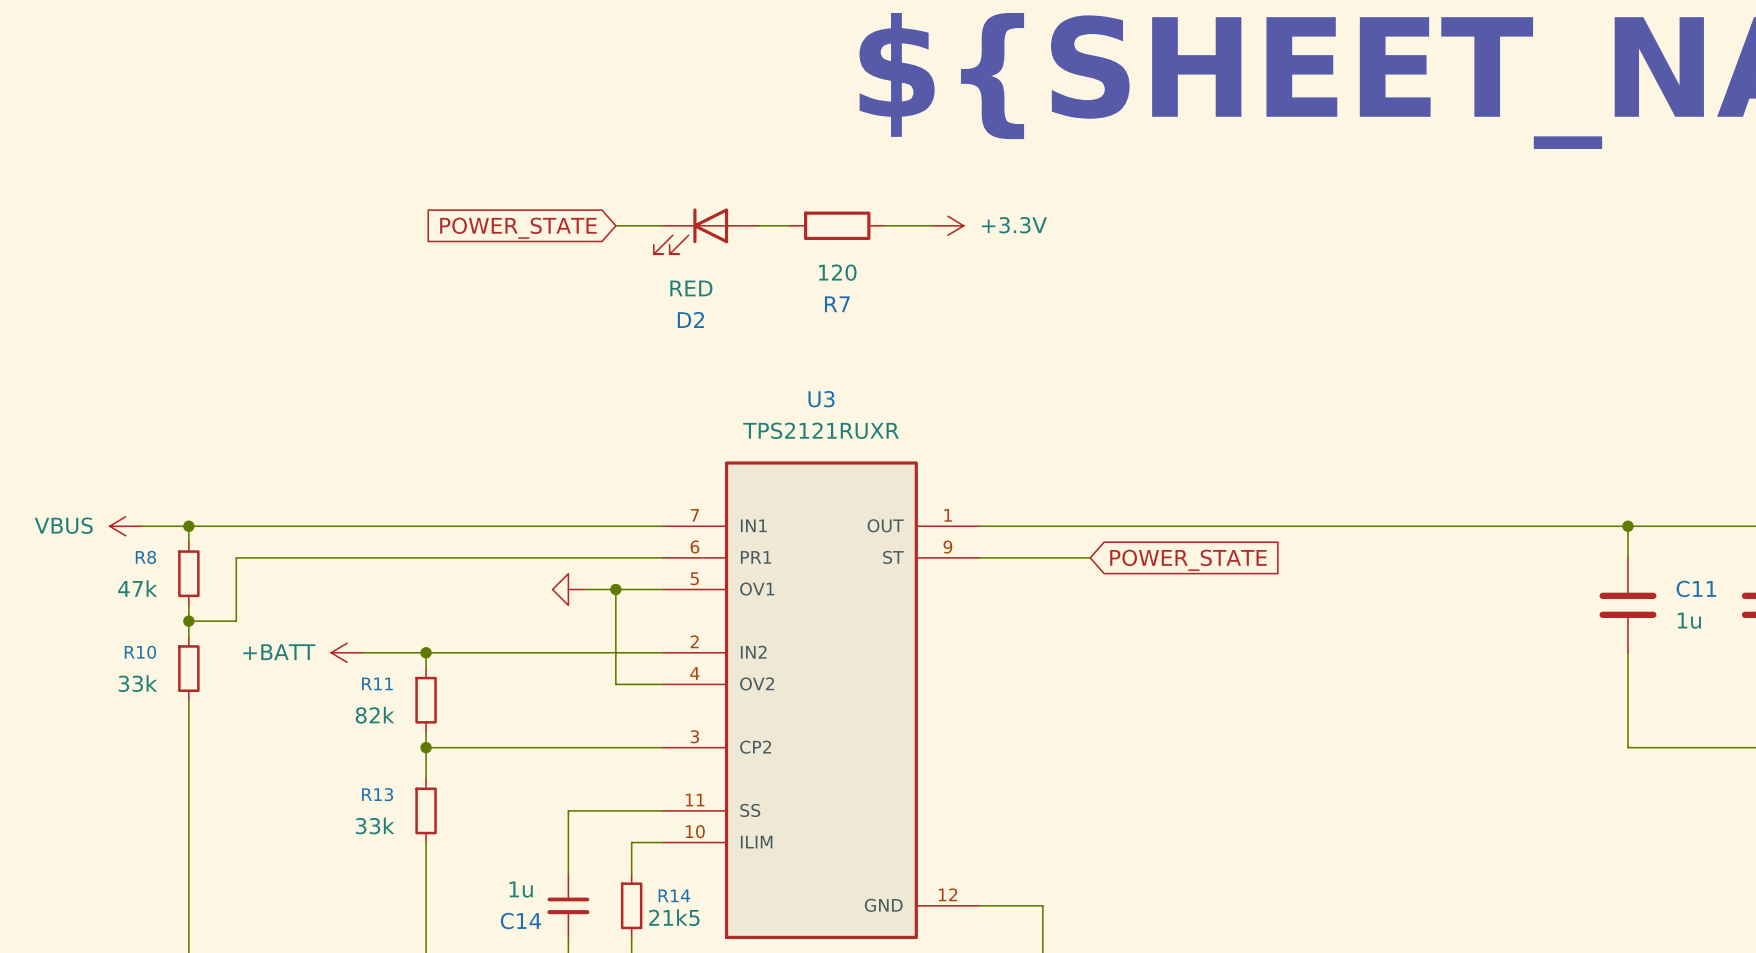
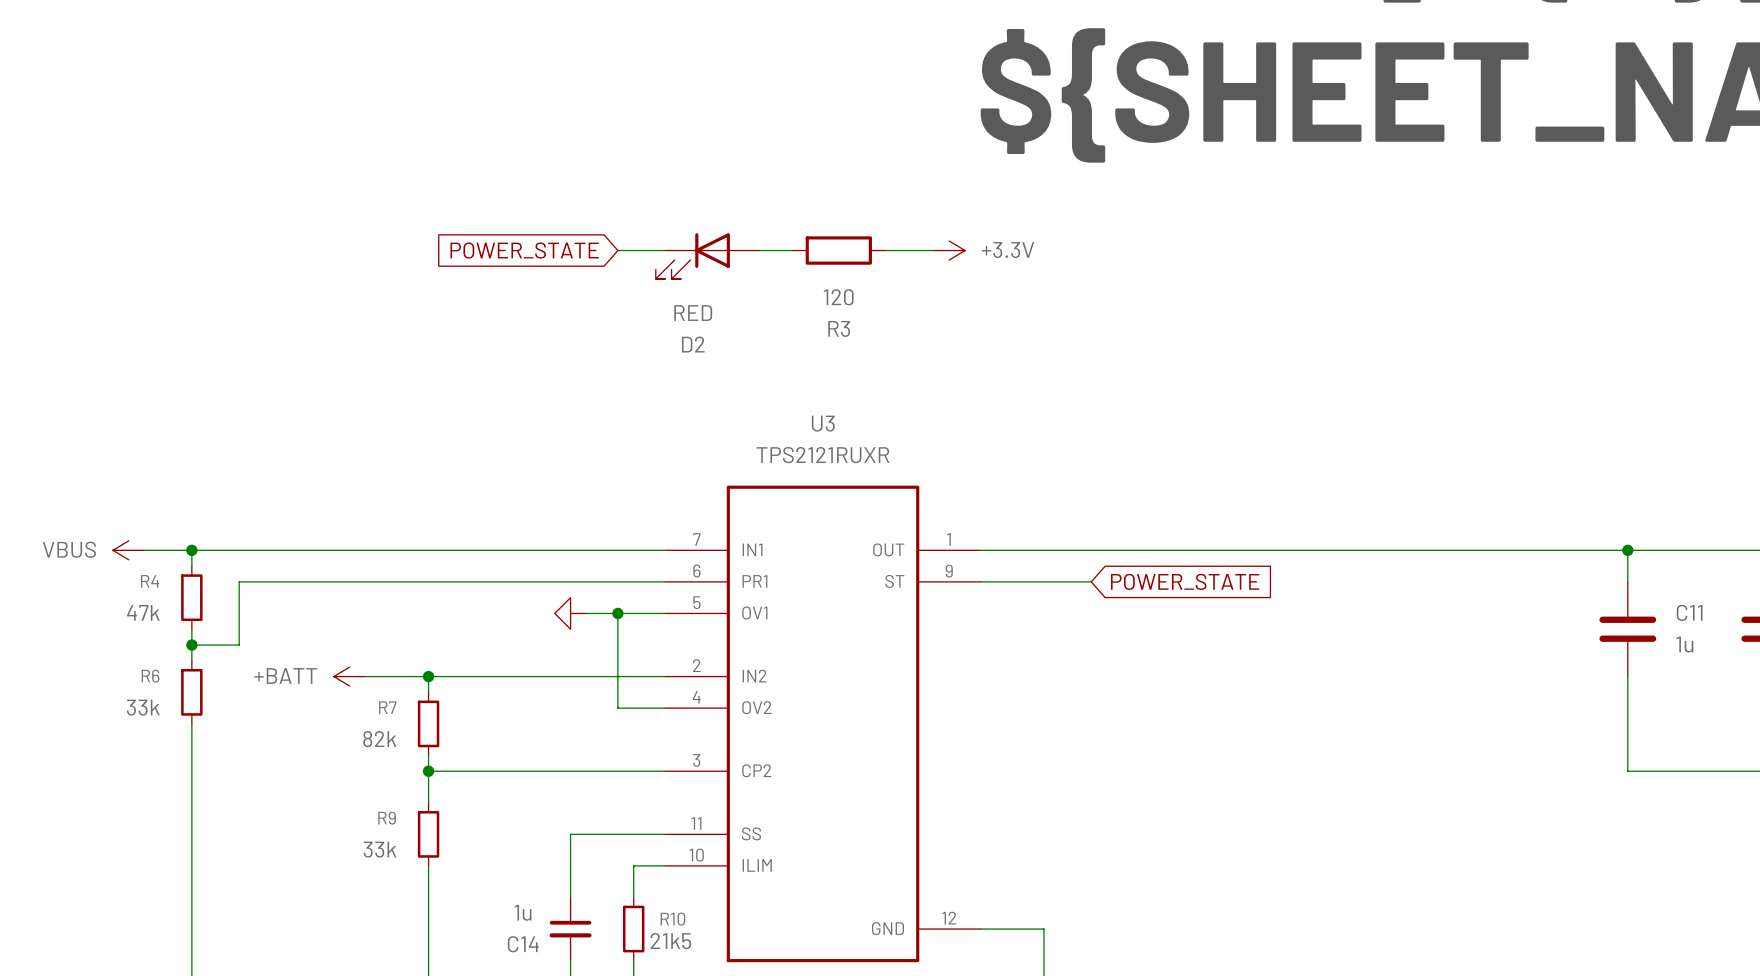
R7 name: R7 (837, 304) -> R3 (839, 328)
R8 name: R8 (145, 557) -> R4 (150, 581)
R10 name: R10 (140, 652) -> R6 (150, 676)
R11 name: R11 (377, 683) -> R7 (387, 707)
R13 name: R13 (377, 794) -> R9 (387, 818)
R14 name: R14 (674, 895) -> R10 (672, 919)

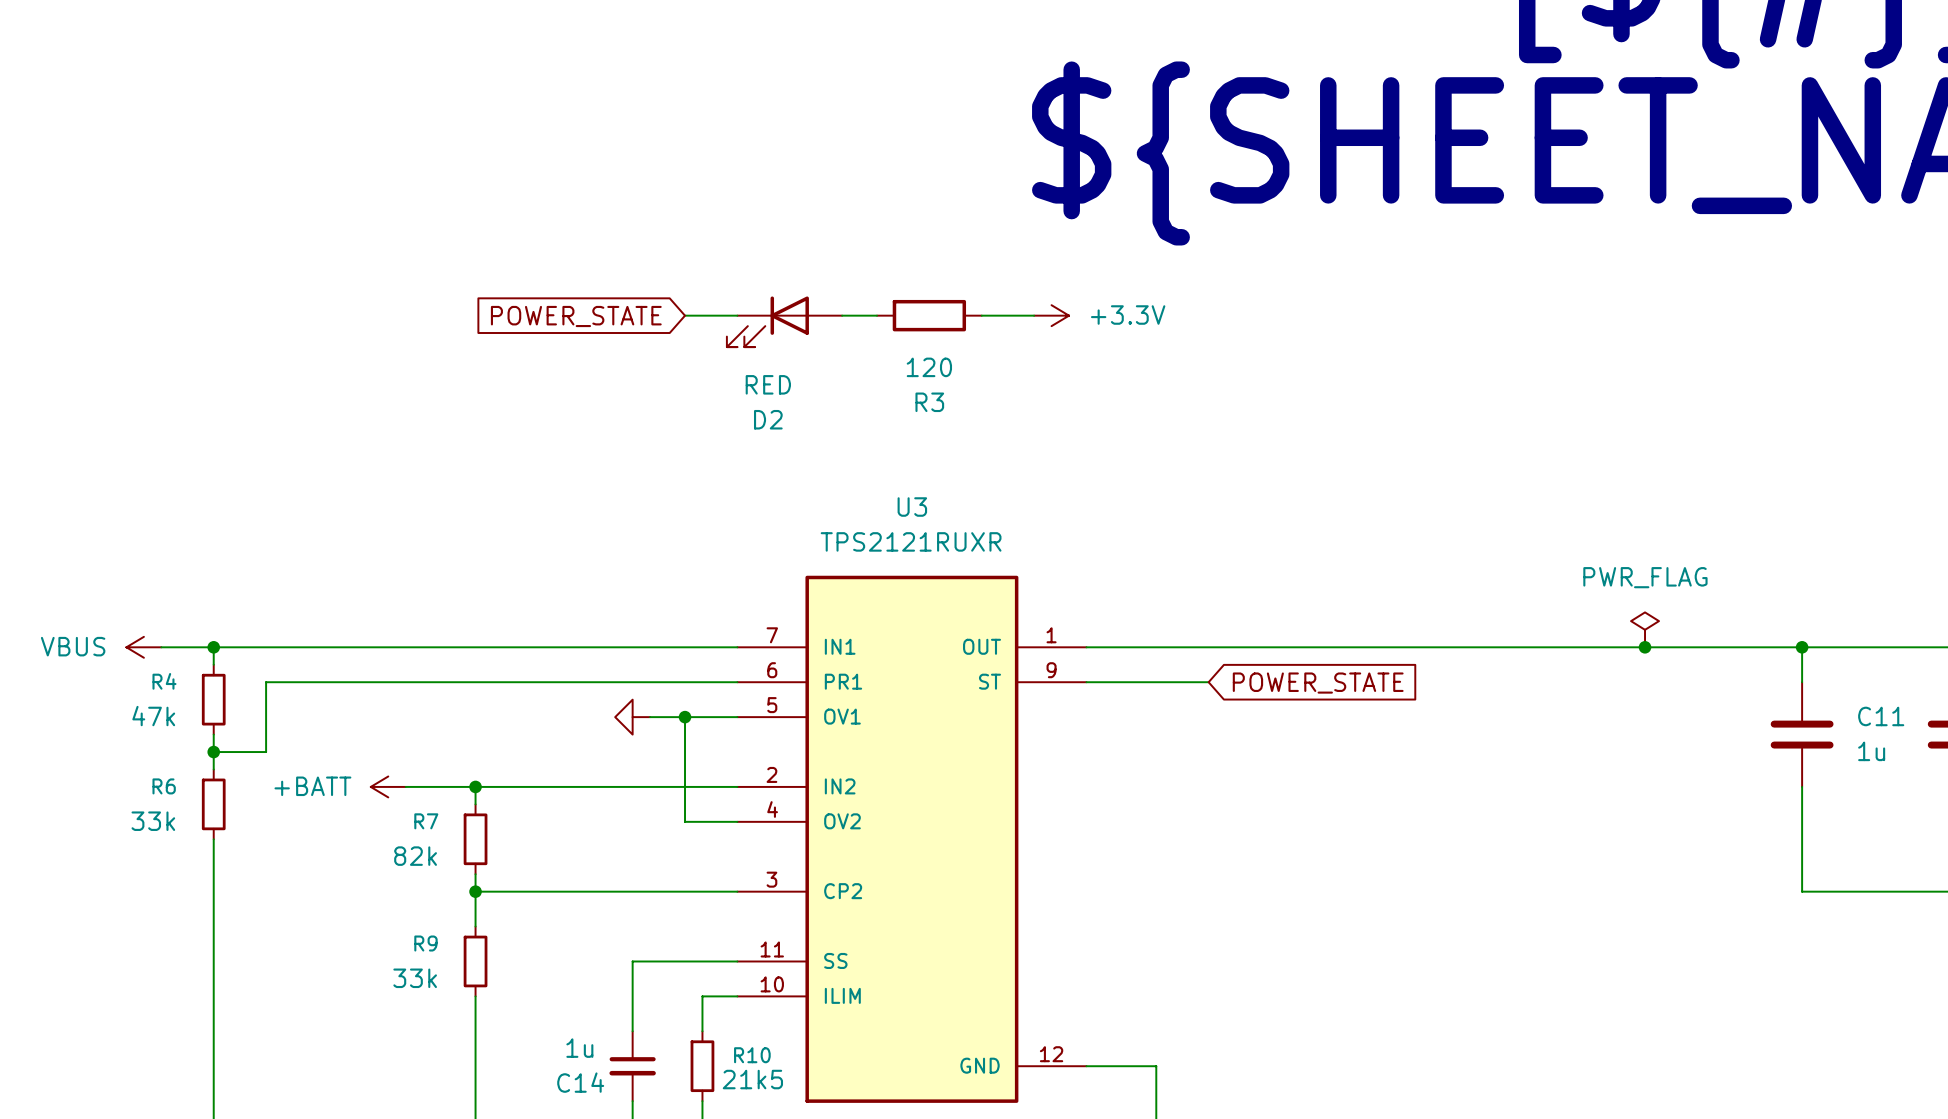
power symbol: none -> PWR_FLAG (1645, 629)
junction: none -> (1645, 647)

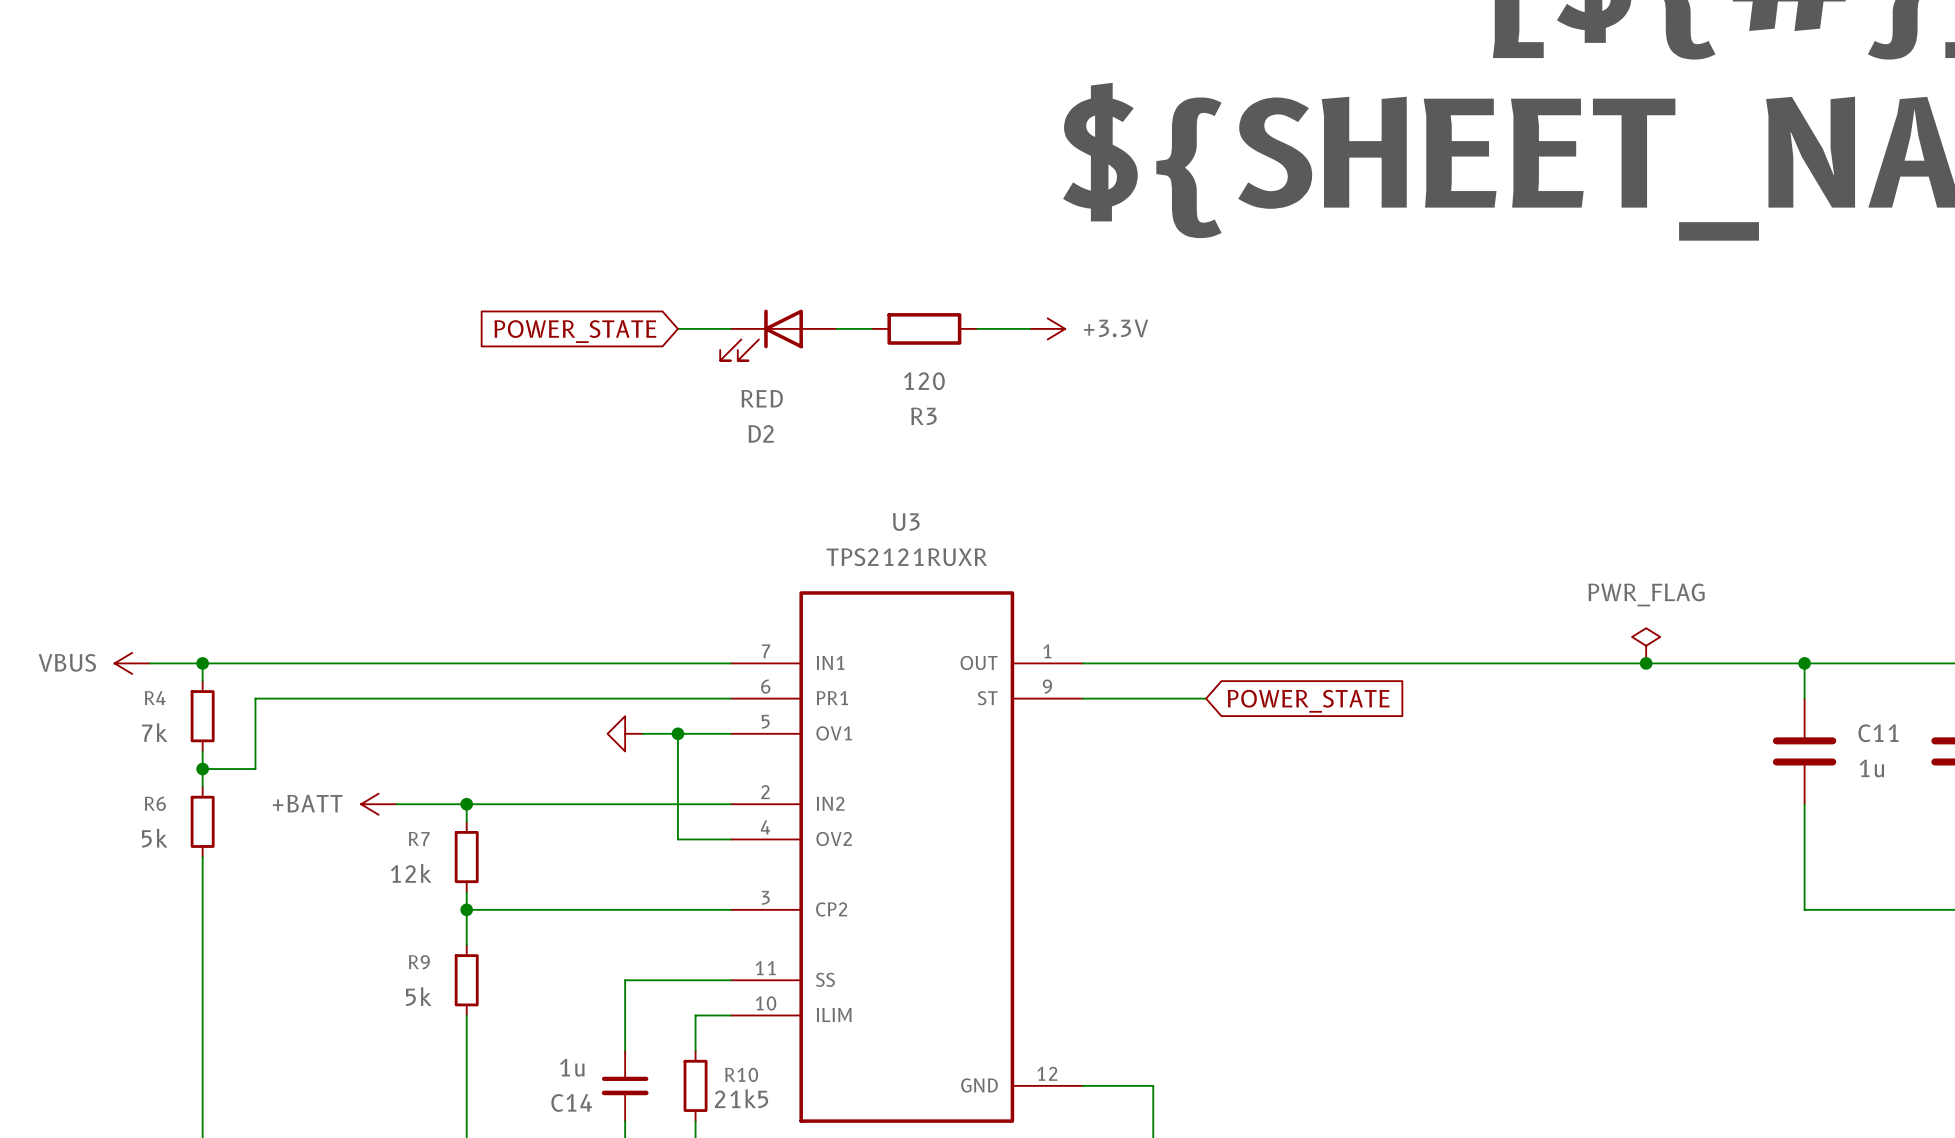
R4 value: 47k (153, 716) -> 7k (154, 732)
R6 value: 33k (153, 821) -> 5k (154, 838)
R7 value: 82k (415, 856) -> 12k (411, 873)
R9 value: 33k (415, 978) -> 5k (418, 996)

